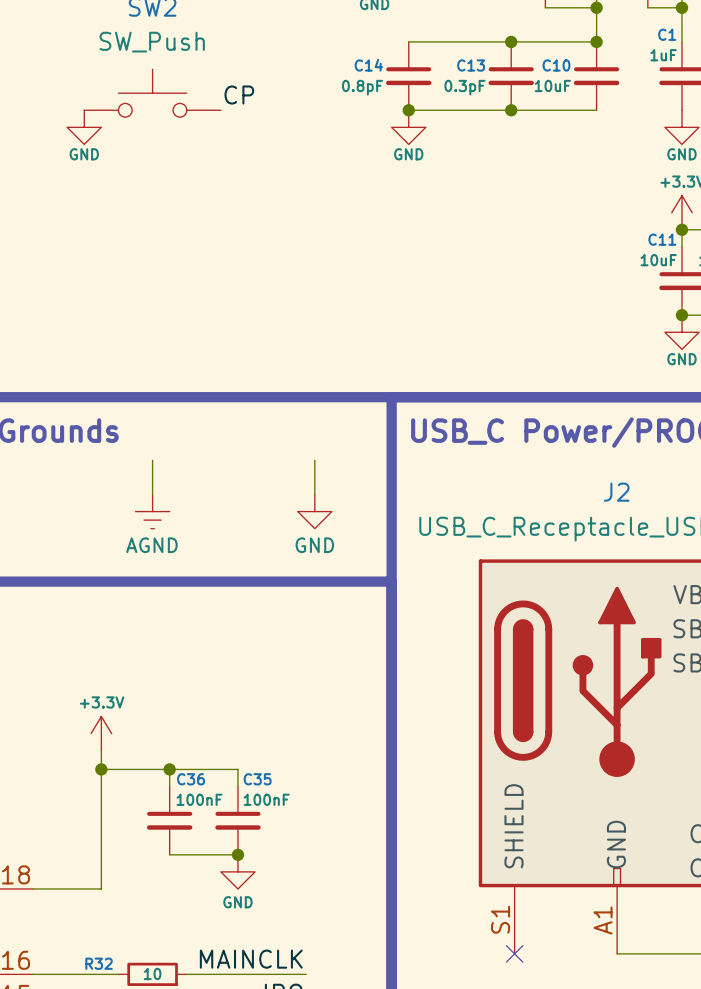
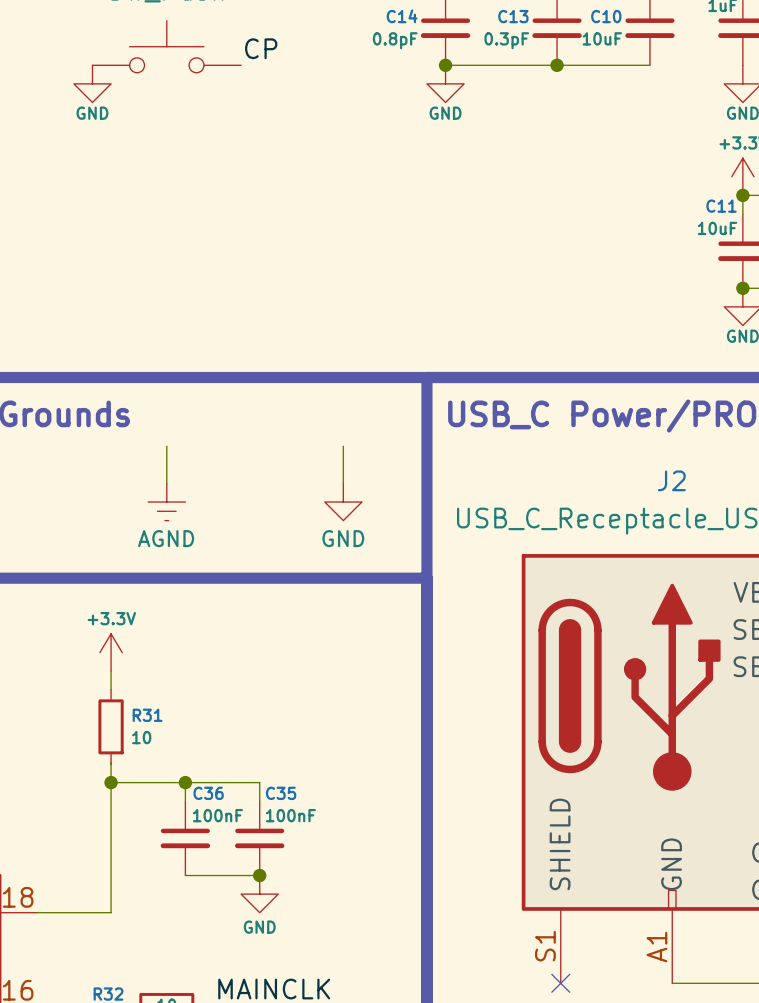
wire: none -> (111, 671) (111, 689)
R31: none -> 10 (111, 726)
power symbol position: +3.3V (101, 733) -> +3.3V (111, 652)

